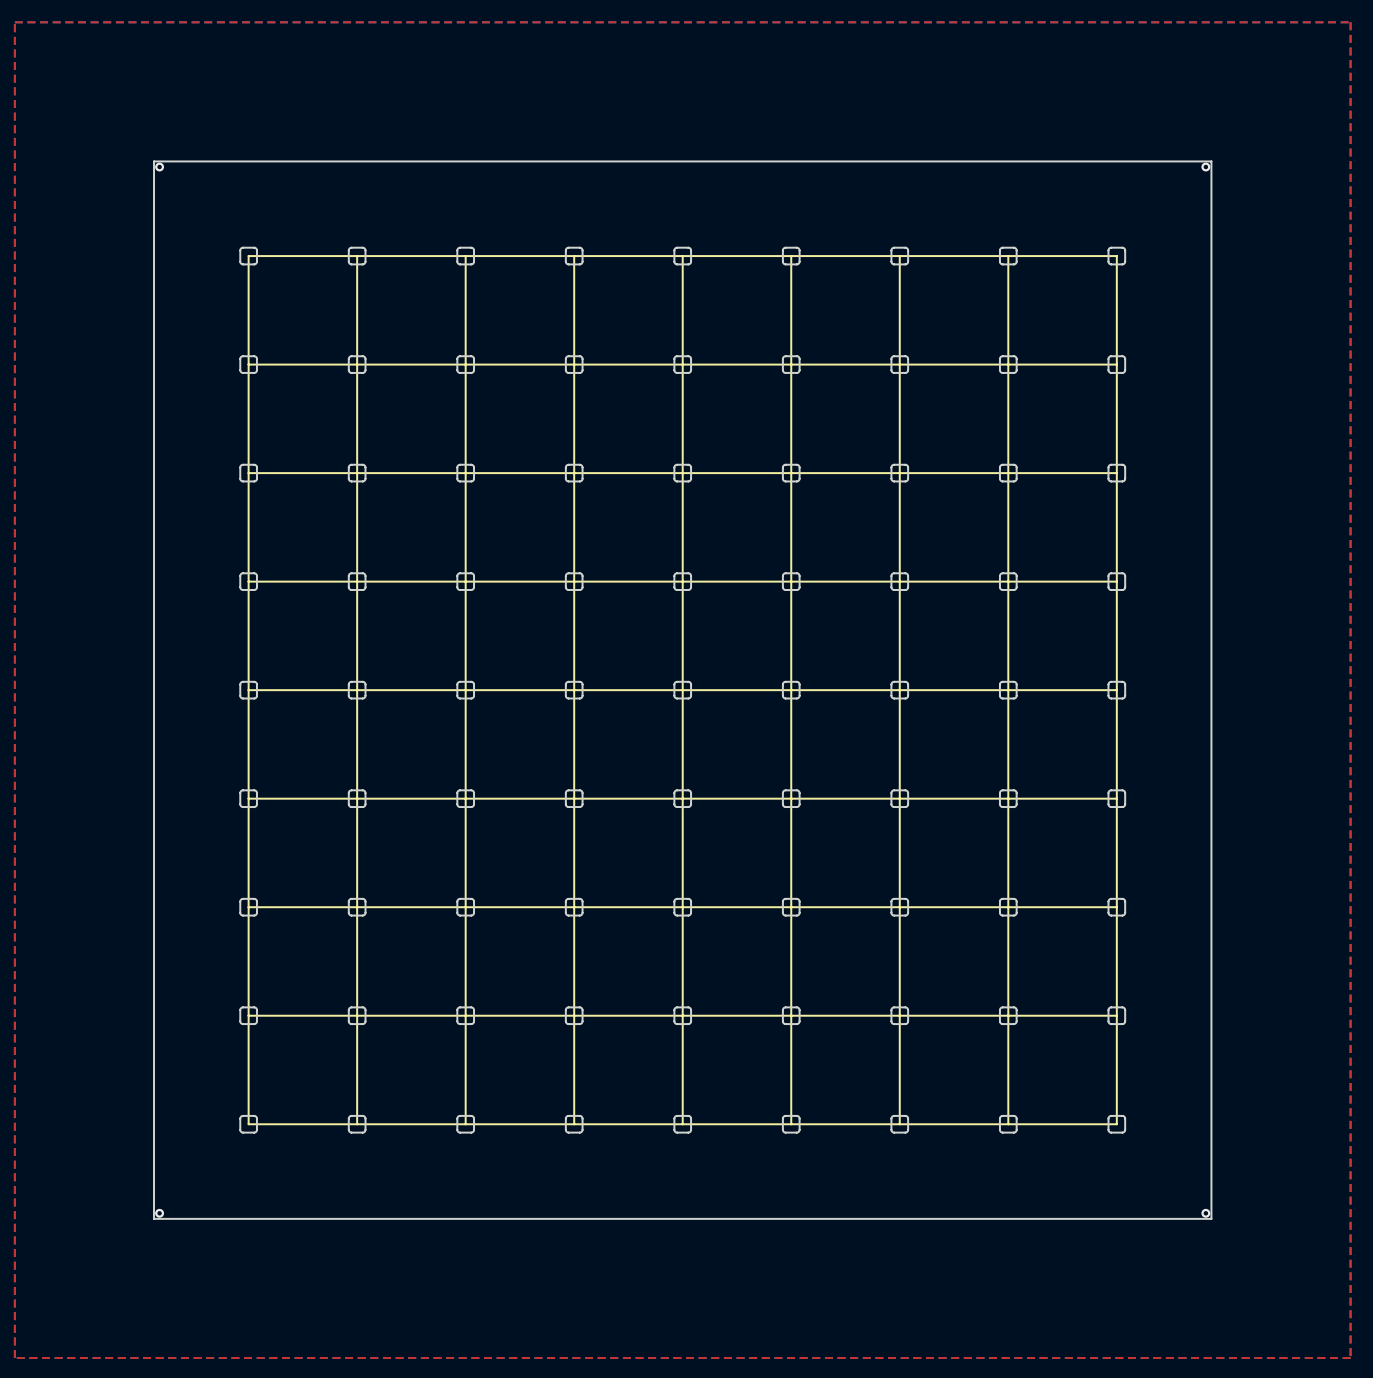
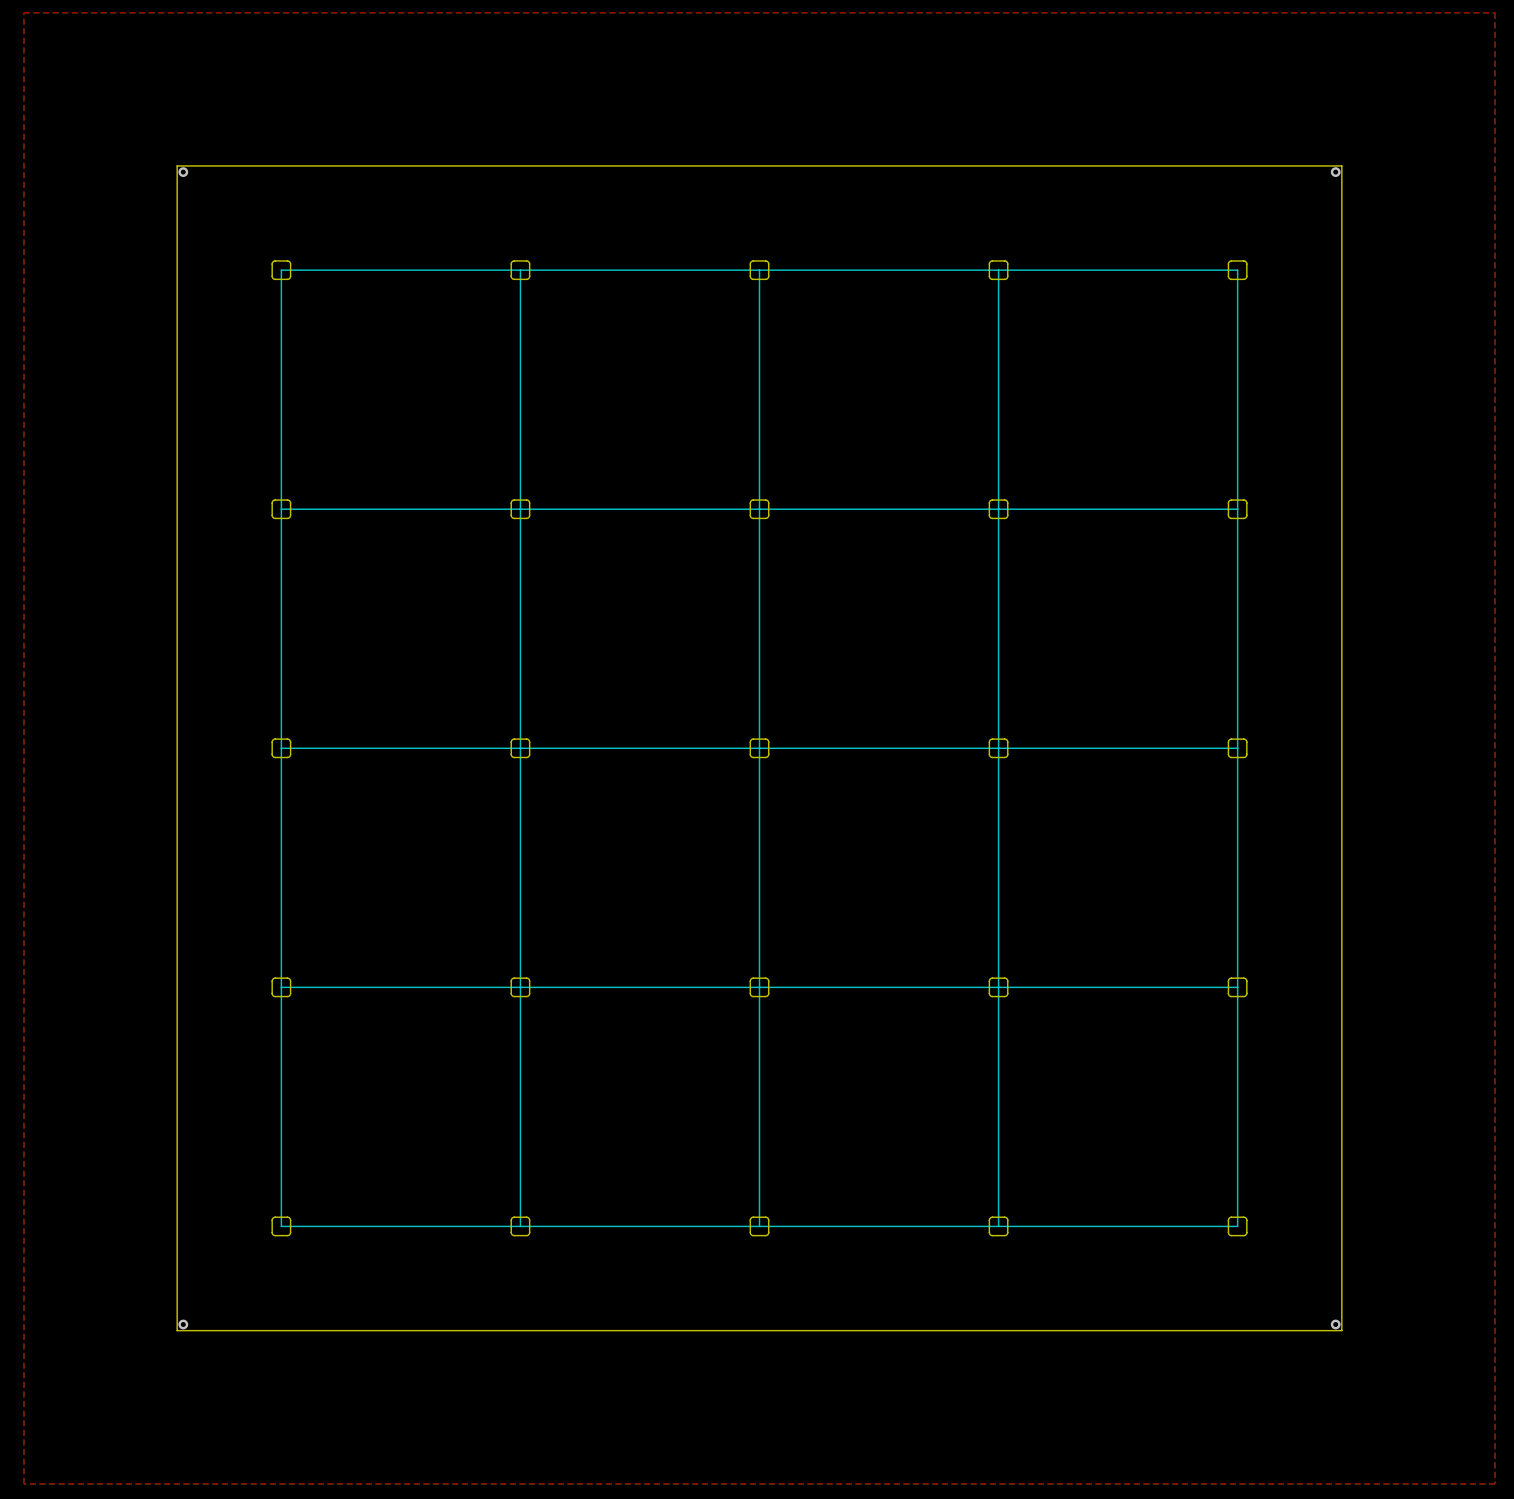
board edge: (351, 247) (364, 248) (364, 263) (349, 263) (348, 250) (351, 247) -> none
board edge: (568, 247) (581, 248) (581, 263) (566, 263) (565, 250) (568, 247) -> none
board edge: (785, 247) (798, 248) (798, 263) (783, 263) (782, 250) (785, 247) -> none
board edge: (1002, 247) (1016, 248) (1015, 263) (1000, 263) (999, 250) (1002, 247) -> none
line: (357, 256) (357, 1124) -> none
line: (574, 256) (574, 1124) -> none
line: (791, 256) (791, 1124) -> none
line: (1008, 256) (1008, 1124) -> none
board edge: (243, 356) (256, 357) (255, 372) (240, 371) (240, 358) (243, 356) -> none
board edge: (351, 356) (364, 357) (364, 372) (349, 371) (348, 358) (351, 356) -> none
board edge: (460, 356) (473, 357) (472, 372) (457, 371) (457, 358) (460, 356) -> none
board edge: (568, 356) (581, 357) (581, 372) (566, 371) (565, 358) (568, 356) -> none
board edge: (677, 356) (690, 357) (690, 372) (674, 371) (674, 358) (677, 356) -> none
board edge: (785, 356) (798, 357) (798, 372) (783, 371) (782, 358) (785, 356) -> none
board edge: (894, 356) (907, 357) (907, 372) (892, 371) (891, 358) (894, 356) -> none
board edge: (1002, 356) (1016, 357) (1015, 372) (1000, 371) (999, 358) (1002, 356) -> none
board edge: (1111, 356) (1124, 357) (1124, 372) (1109, 371) (1108, 358) (1111, 356) -> none
line: (248, 364) (1116, 364) -> none
board edge: (351, 464) (364, 465) (364, 480) (349, 480) (348, 467) (351, 464) -> none
board edge: (568, 464) (581, 465) (581, 480) (566, 480) (565, 467) (568, 464) -> none
board edge: (785, 464) (798, 465) (798, 480) (783, 480) (782, 467) (785, 464) -> none
board edge: (1002, 464) (1016, 465) (1015, 480) (1000, 480) (999, 467) (1002, 464) -> none
board edge: (243, 573) (256, 574) (255, 589) (240, 588) (240, 575) (243, 573) -> none
board edge: (351, 573) (364, 574) (364, 589) (349, 588) (348, 575) (351, 573) -> none
board edge: (460, 573) (473, 574) (472, 589) (457, 588) (457, 575) (460, 573) -> none
board edge: (568, 573) (581, 574) (581, 589) (566, 588) (565, 575) (568, 573) -> none
board edge: (677, 573) (690, 574) (690, 589) (674, 588) (674, 575) (677, 573) -> none
board edge: (785, 573) (798, 574) (798, 589) (783, 588) (782, 575) (785, 573) -> none
board edge: (894, 573) (907, 574) (907, 589) (892, 588) (891, 575) (894, 573) -> none
board edge: (1002, 573) (1016, 574) (1015, 589) (1000, 588) (999, 575) (1002, 573) -> none
board edge: (1111, 573) (1124, 574) (1124, 589) (1109, 588) (1108, 575) (1111, 573) -> none
line: (248, 581) (1116, 581) -> none
board edge: (351, 681) (364, 682) (364, 697) (349, 697) (348, 684) (351, 681) -> none
board edge: (568, 681) (581, 682) (581, 697) (566, 697) (565, 684) (568, 681) -> none
board edge: (785, 681) (798, 682) (798, 697) (783, 697) (782, 684) (785, 681) -> none
board edge: (1002, 681) (1016, 682) (1015, 697) (1000, 697) (999, 684) (1002, 681) -> none
board edge: (243, 790) (256, 791) (255, 806) (240, 805) (240, 792) (243, 790) -> none
board edge: (351, 790) (364, 791) (364, 806) (349, 805) (348, 792) (351, 790) -> none
board edge: (460, 790) (473, 791) (472, 806) (457, 805) (457, 792) (460, 790) -> none
board edge: (568, 790) (581, 791) (581, 806) (566, 805) (565, 792) (568, 790) -> none
board edge: (677, 790) (690, 791) (690, 806) (674, 805) (674, 792) (677, 790) -> none
board edge: (785, 790) (798, 791) (798, 806) (783, 805) (782, 792) (785, 790) -> none
board edge: (894, 790) (907, 791) (907, 806) (892, 805) (891, 792) (894, 790) -> none
board edge: (1002, 790) (1016, 791) (1015, 806) (1000, 805) (999, 792) (1002, 790) -> none
board edge: (1111, 790) (1124, 791) (1124, 806) (1109, 805) (1108, 792) (1111, 790) -> none
line: (248, 798) (1116, 798) -> none
board edge: (351, 898) (364, 899) (364, 914) (349, 914) (348, 901) (351, 898) -> none
board edge: (568, 898) (581, 899) (581, 914) (566, 914) (565, 901) (568, 898) -> none
board edge: (785, 898) (798, 899) (798, 914) (783, 914) (782, 901) (785, 898) -> none
board edge: (1002, 898) (1016, 899) (1015, 914) (1000, 914) (999, 901) (1002, 898) -> none
board edge: (243, 1007) (256, 1008) (255, 1023) (240, 1023) (240, 1009) (243, 1007) -> none
board edge: (351, 1007) (364, 1008) (364, 1023) (349, 1023) (348, 1009) (351, 1007) -> none
board edge: (460, 1007) (473, 1008) (472, 1023) (457, 1023) (457, 1009) (460, 1007) -> none
board edge: (568, 1007) (581, 1008) (581, 1023) (566, 1023) (565, 1009) (568, 1007) -> none
board edge: (677, 1007) (690, 1008) (690, 1023) (674, 1023) (674, 1009) (677, 1007) -> none
board edge: (785, 1007) (798, 1008) (798, 1023) (783, 1023) (782, 1009) (785, 1007) -> none
board edge: (894, 1007) (907, 1008) (907, 1023) (892, 1023) (891, 1009) (894, 1007) -> none
board edge: (1002, 1007) (1016, 1008) (1015, 1023) (1000, 1023) (999, 1009) (1002, 1007) -> none
board edge: (1111, 1007) (1124, 1008) (1124, 1023) (1109, 1023) (1108, 1009) (1111, 1007) -> none
line: (248, 1015) (1116, 1015) -> none
board edge: (351, 1115) (364, 1116) (364, 1132) (349, 1131) (348, 1118) (351, 1115) -> none
board edge: (568, 1115) (581, 1116) (581, 1132) (566, 1131) (565, 1118) (568, 1115) -> none
board edge: (785, 1115) (798, 1116) (798, 1132) (783, 1131) (782, 1118) (785, 1115) -> none
board edge: (1002, 1115) (1016, 1116) (1015, 1132) (1000, 1131) (999, 1118) (1002, 1115) -> none

